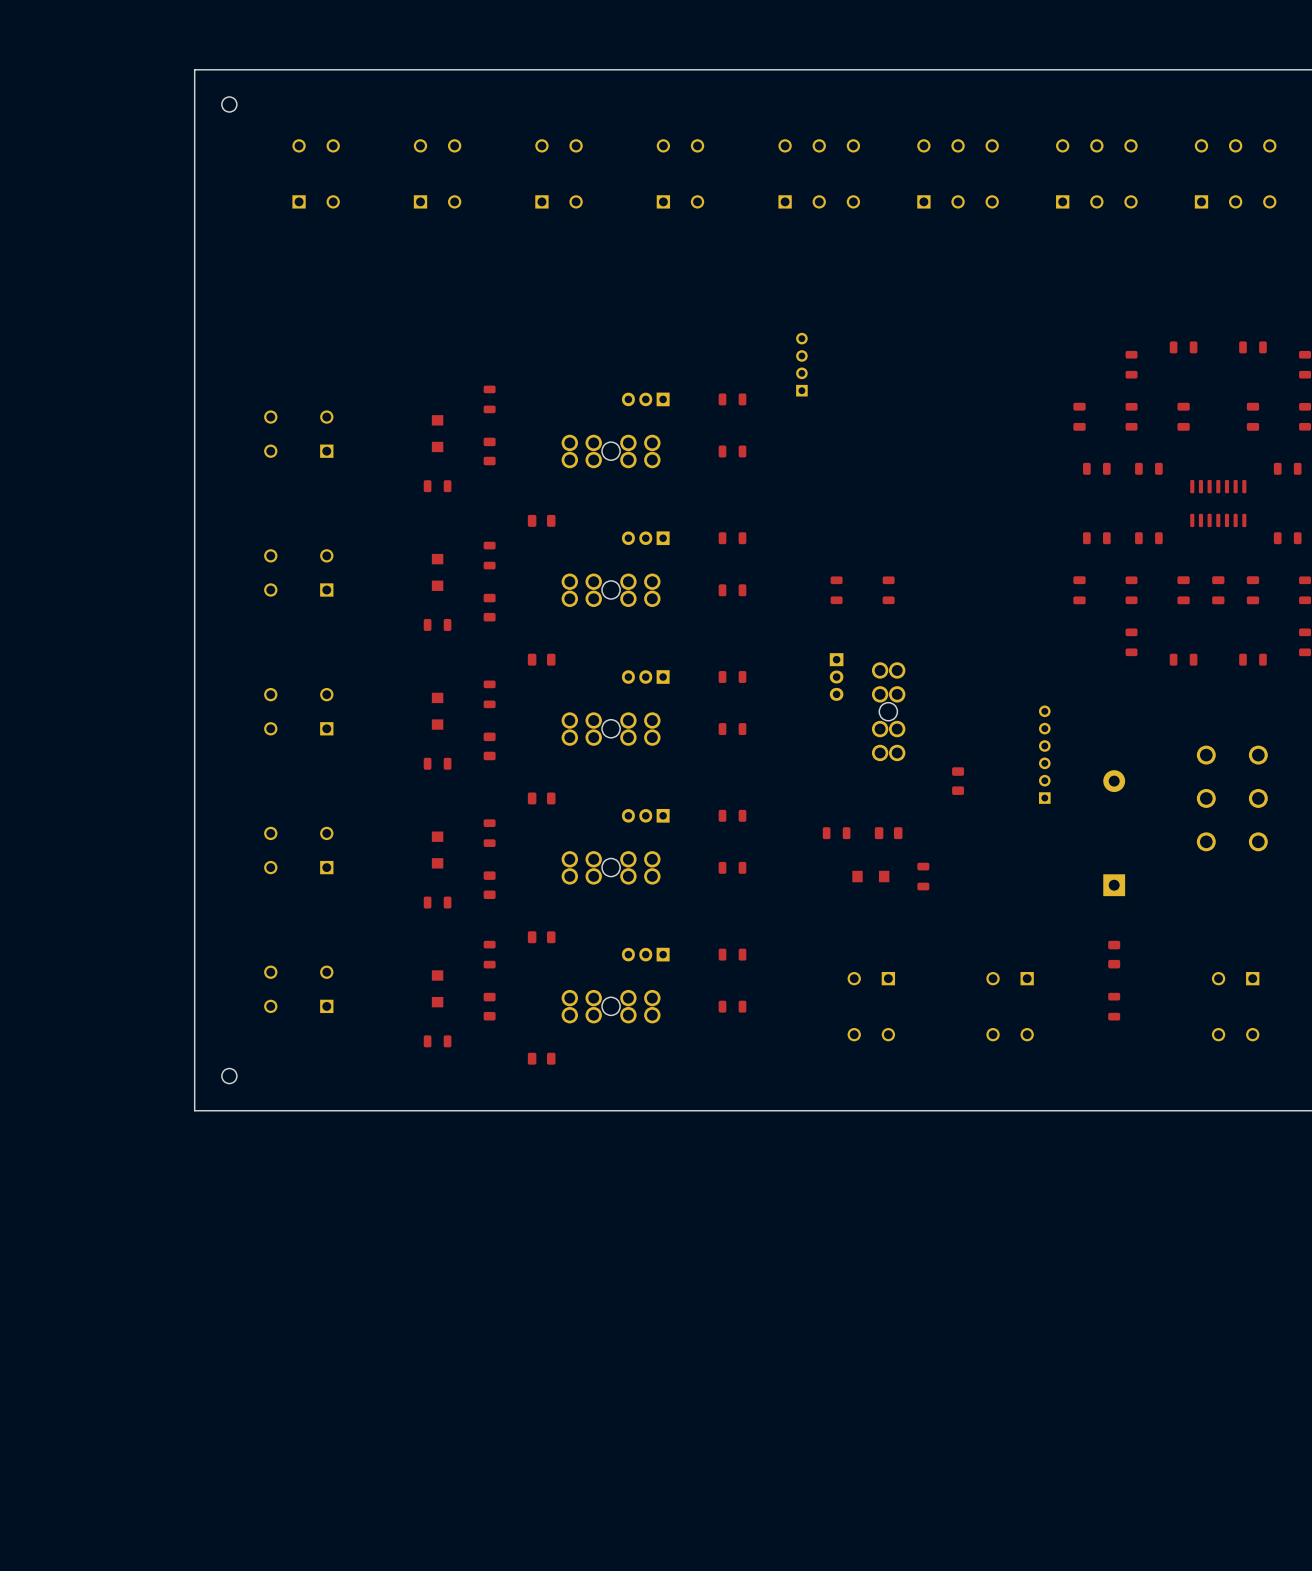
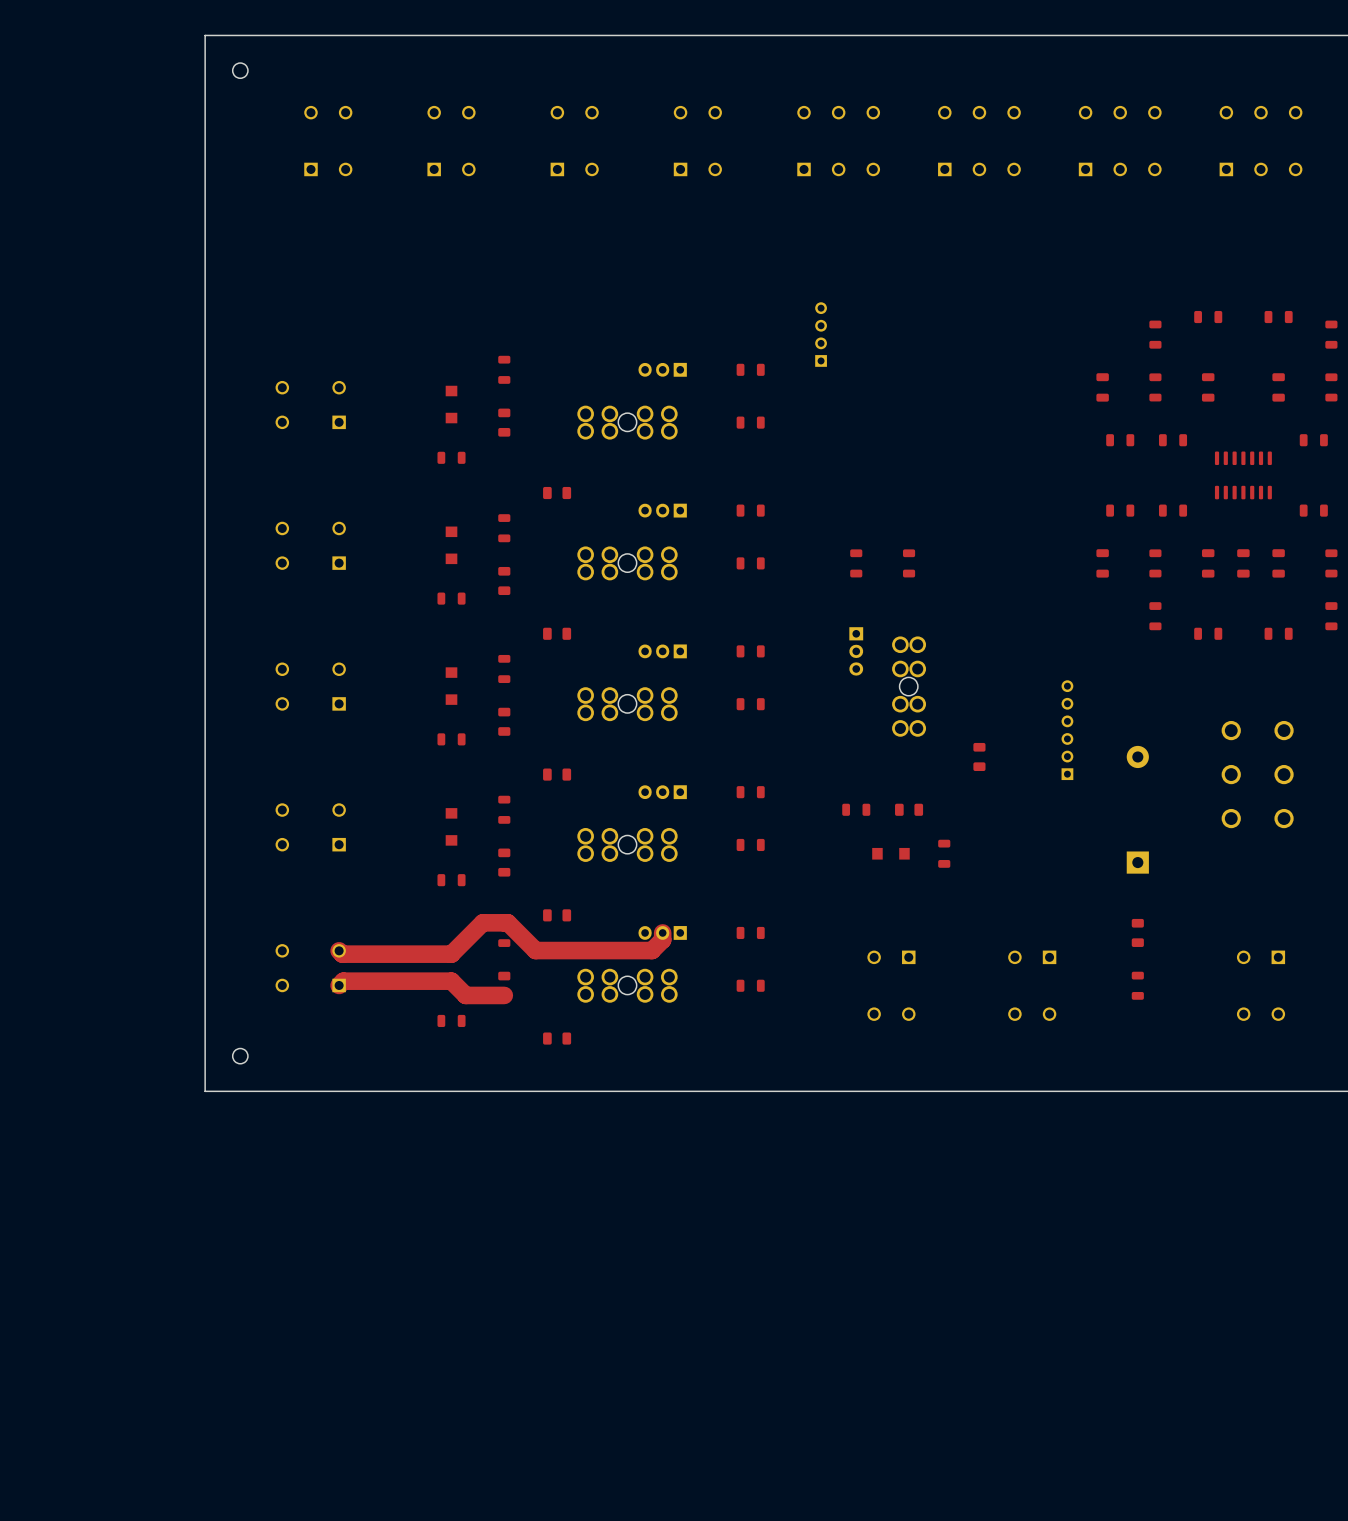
top track: none -> (662, 932) (662, 939) (652, 950) (535, 950) (507, 922) (482, 922) (451, 954) (342, 954) (339, 950)
top track: none -> (339, 985) (343, 981) (451, 981) (465, 995) (504, 995)

